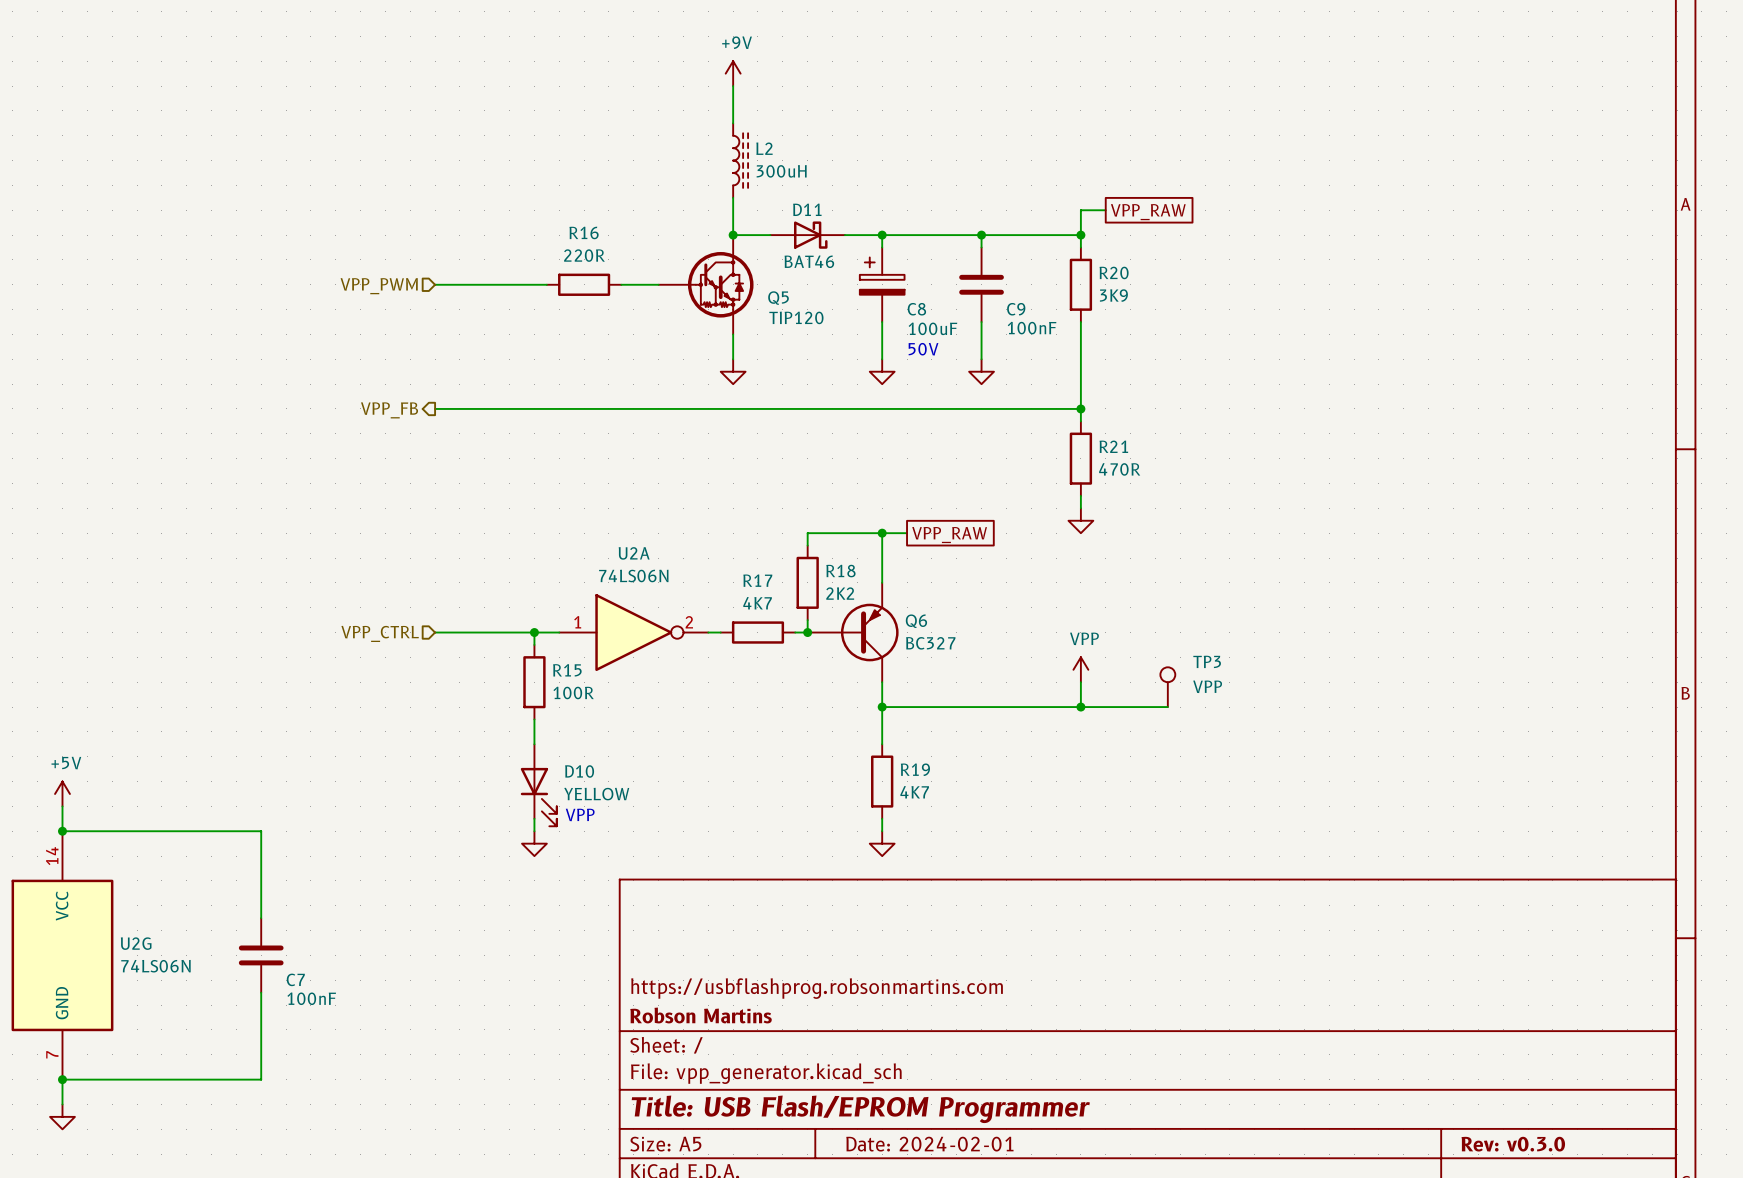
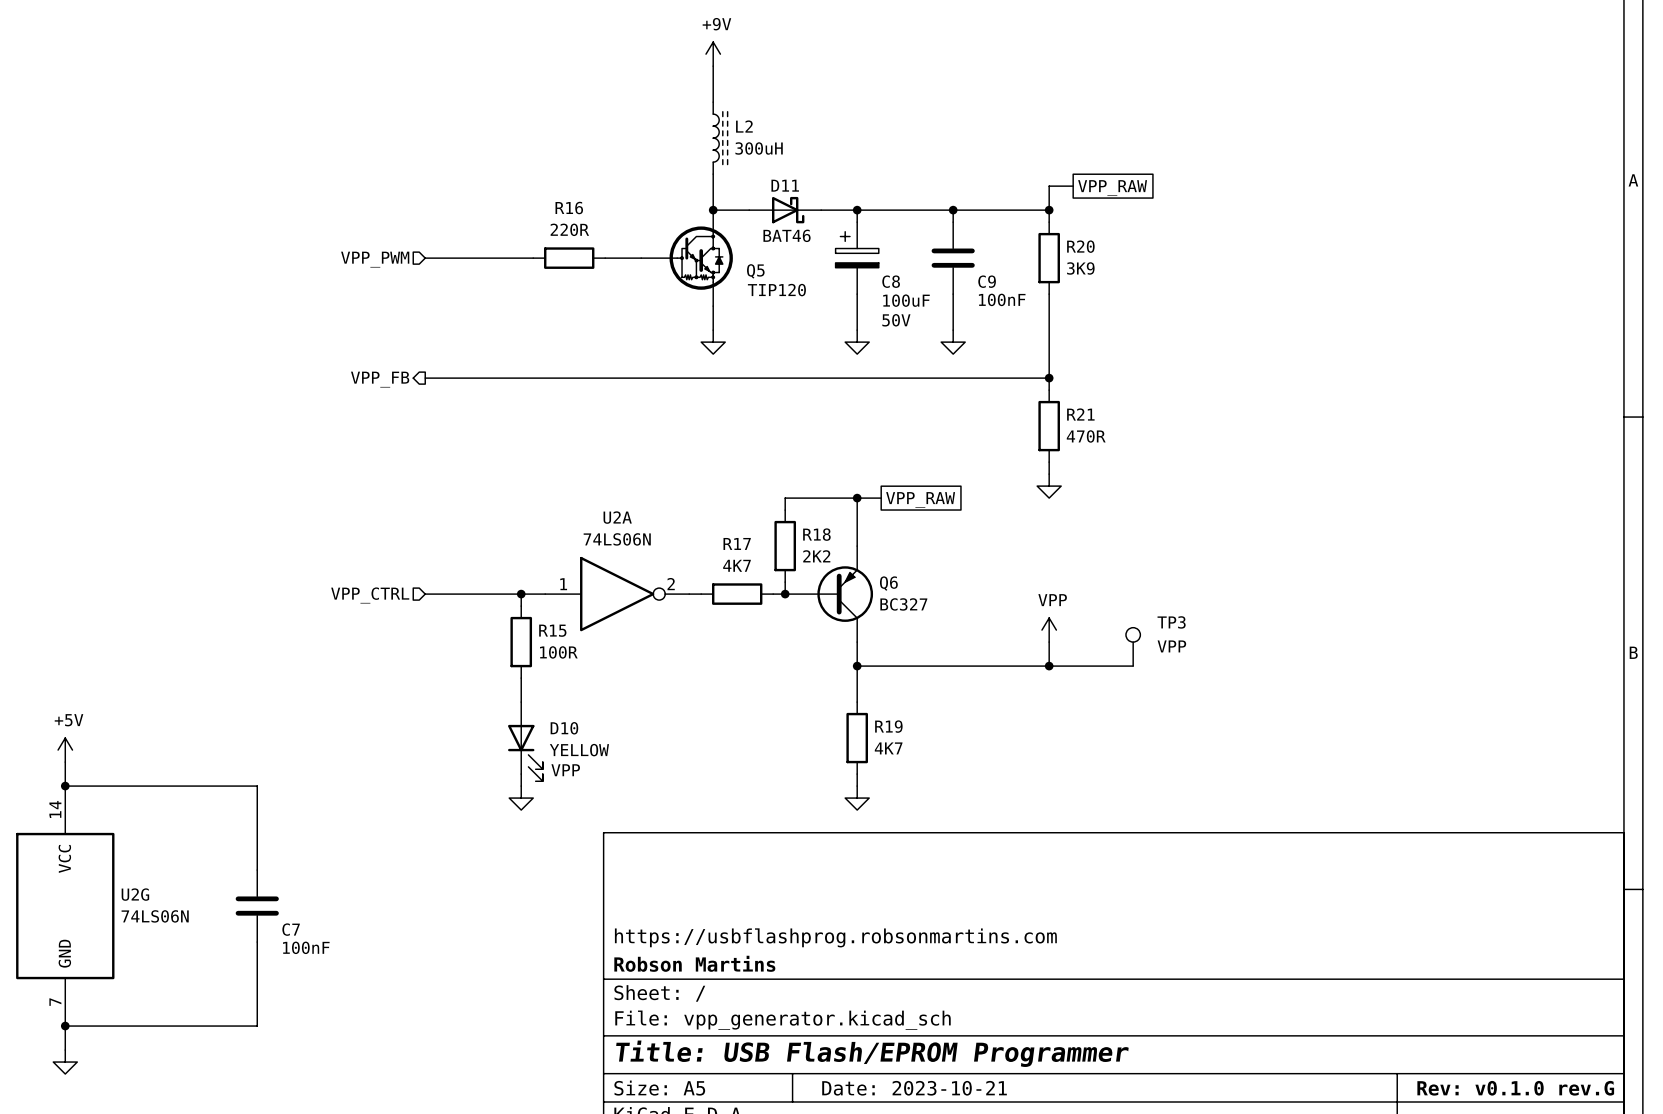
title block: Date: 2024-02-01 (929, 1144) -> Date: 2023-10-21 (914, 1088)
title block: Rev: v0.3.0 (1513, 1144) -> Rev: v0.1.0 rev.G (1515, 1088)

